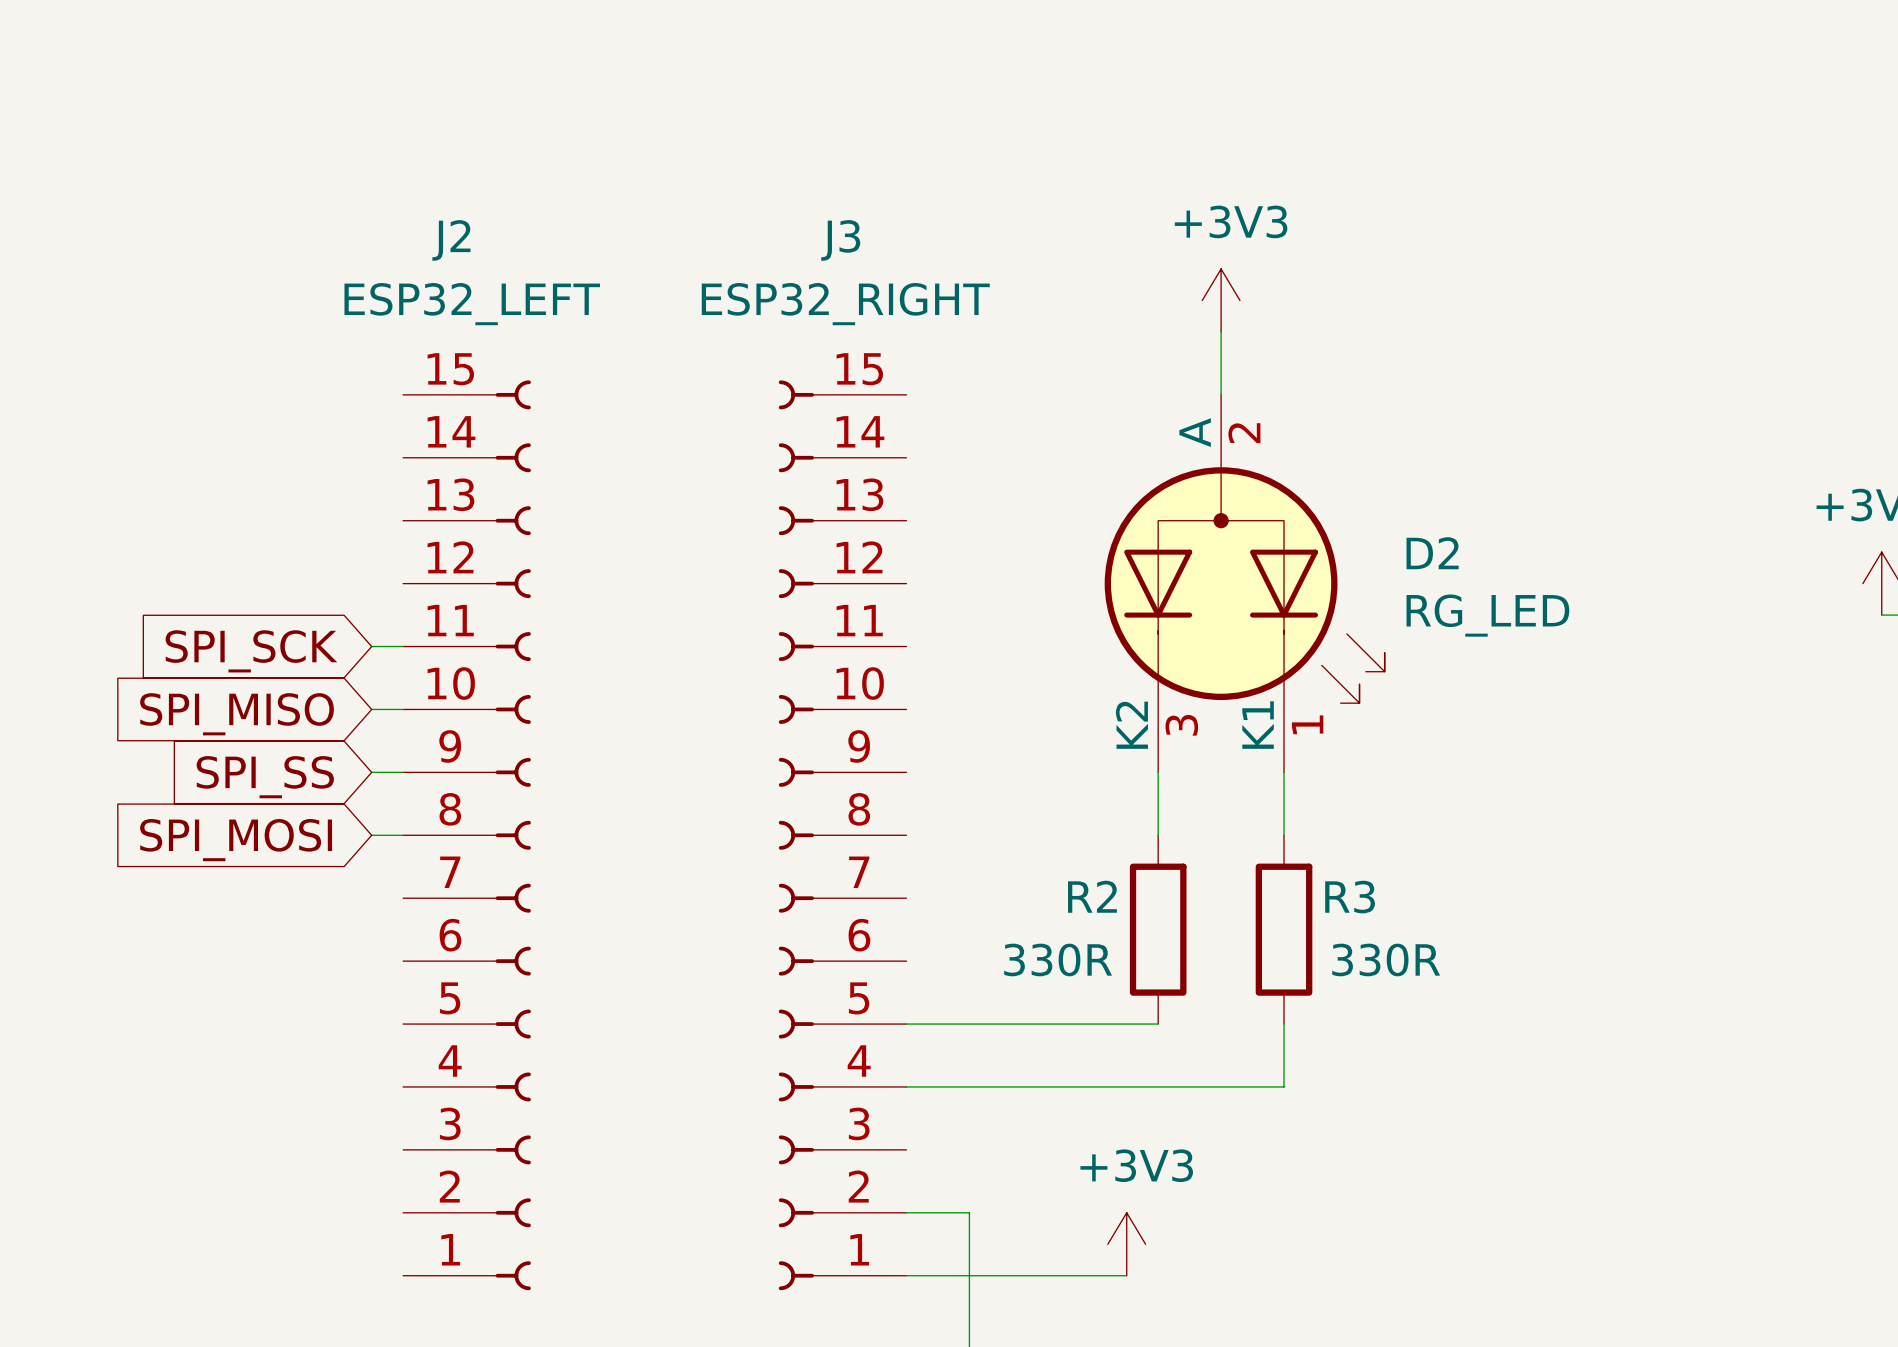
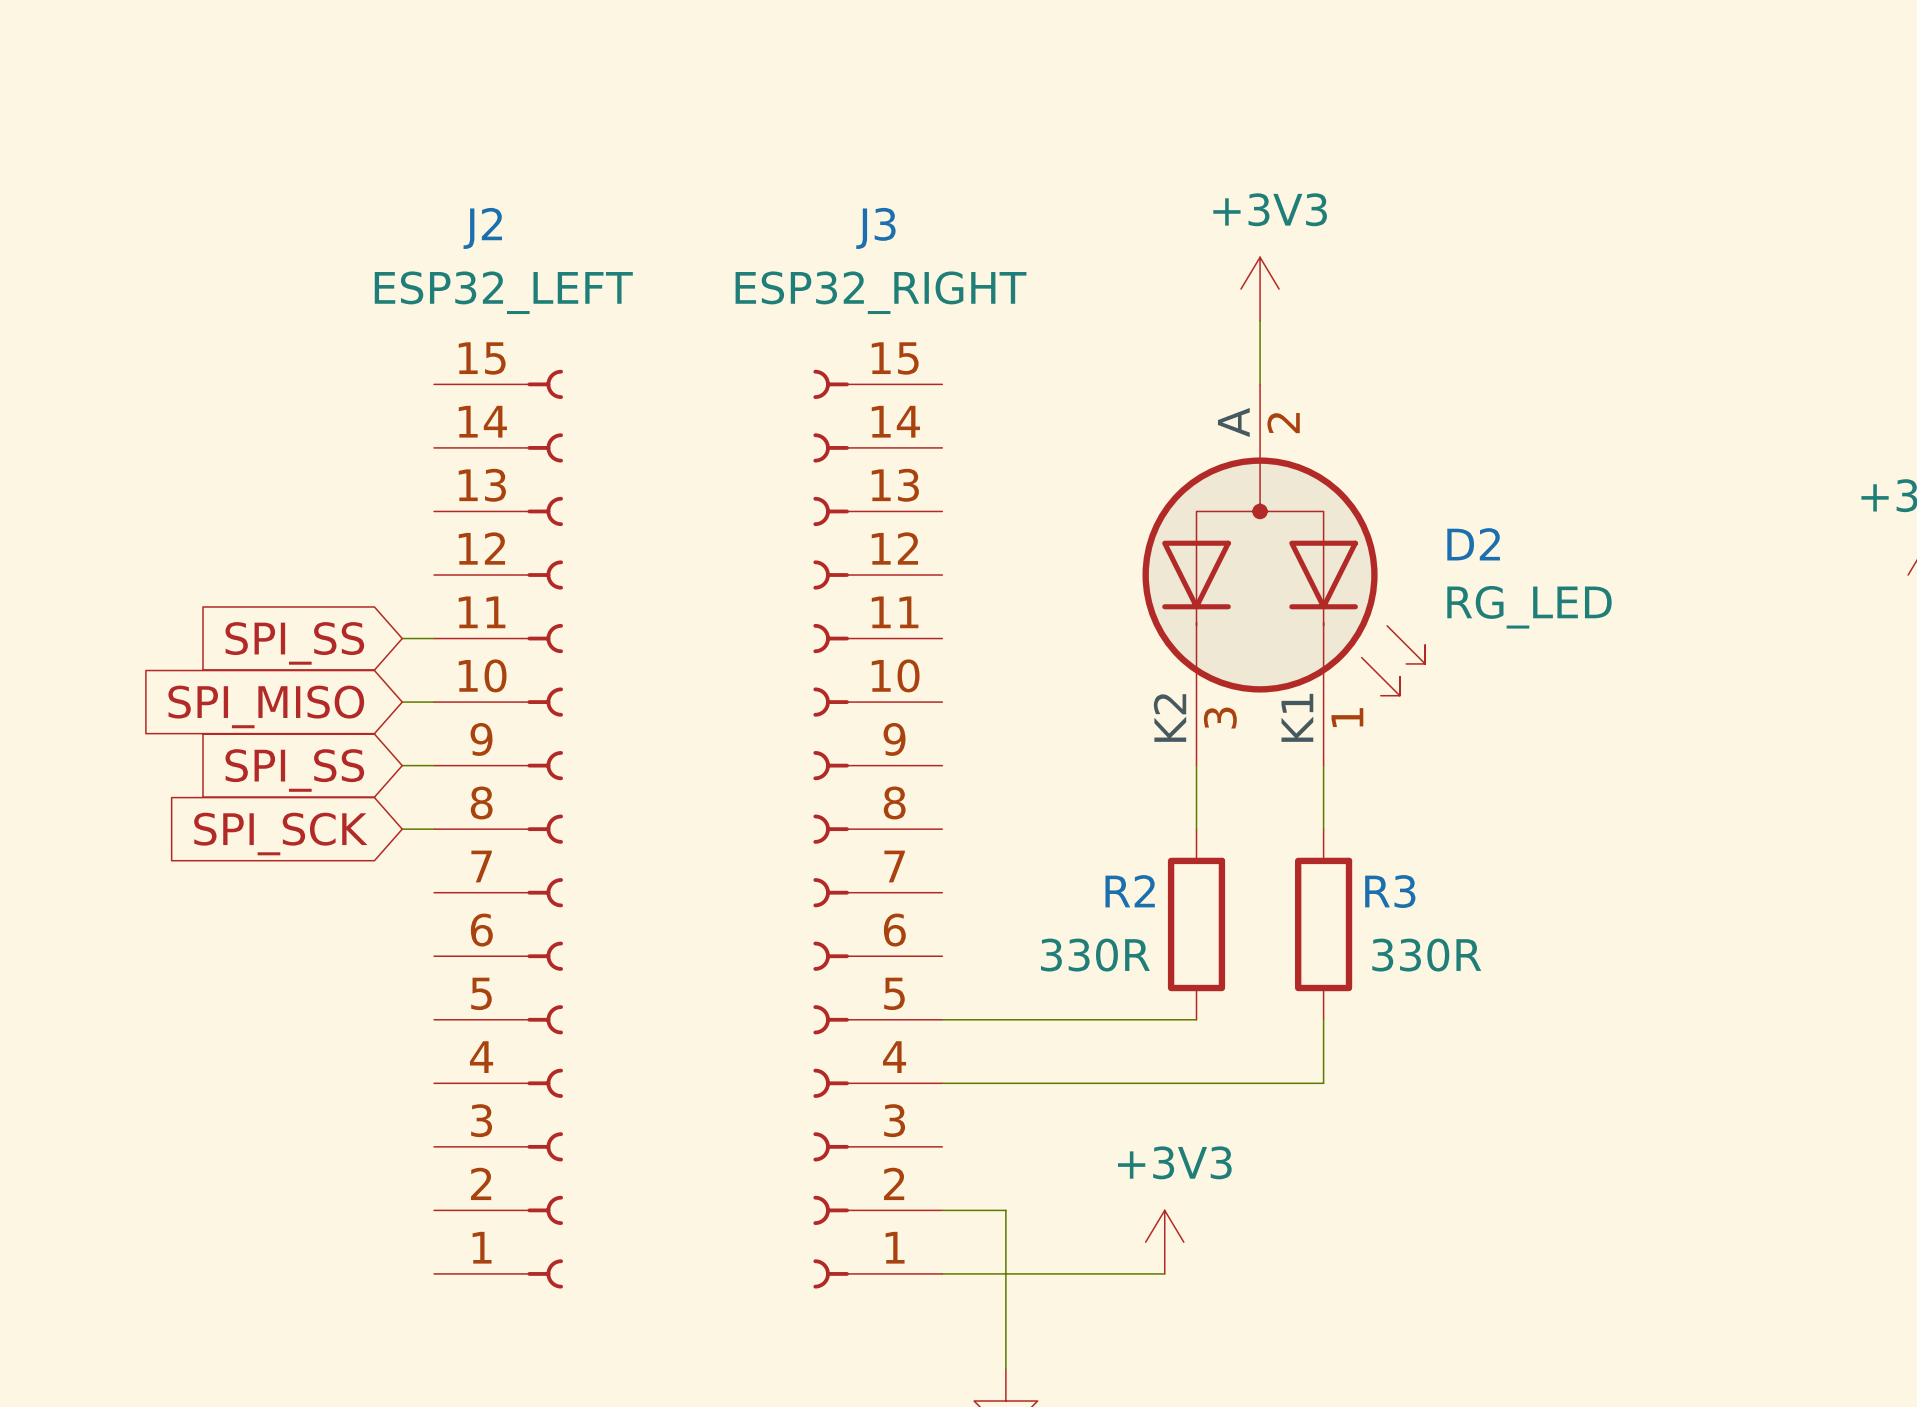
global label: SPI_SCK (251, 651) -> SPI_SS (294, 643)
global label: SPI_MOSI (236, 840) -> SPI_SCK (280, 834)

